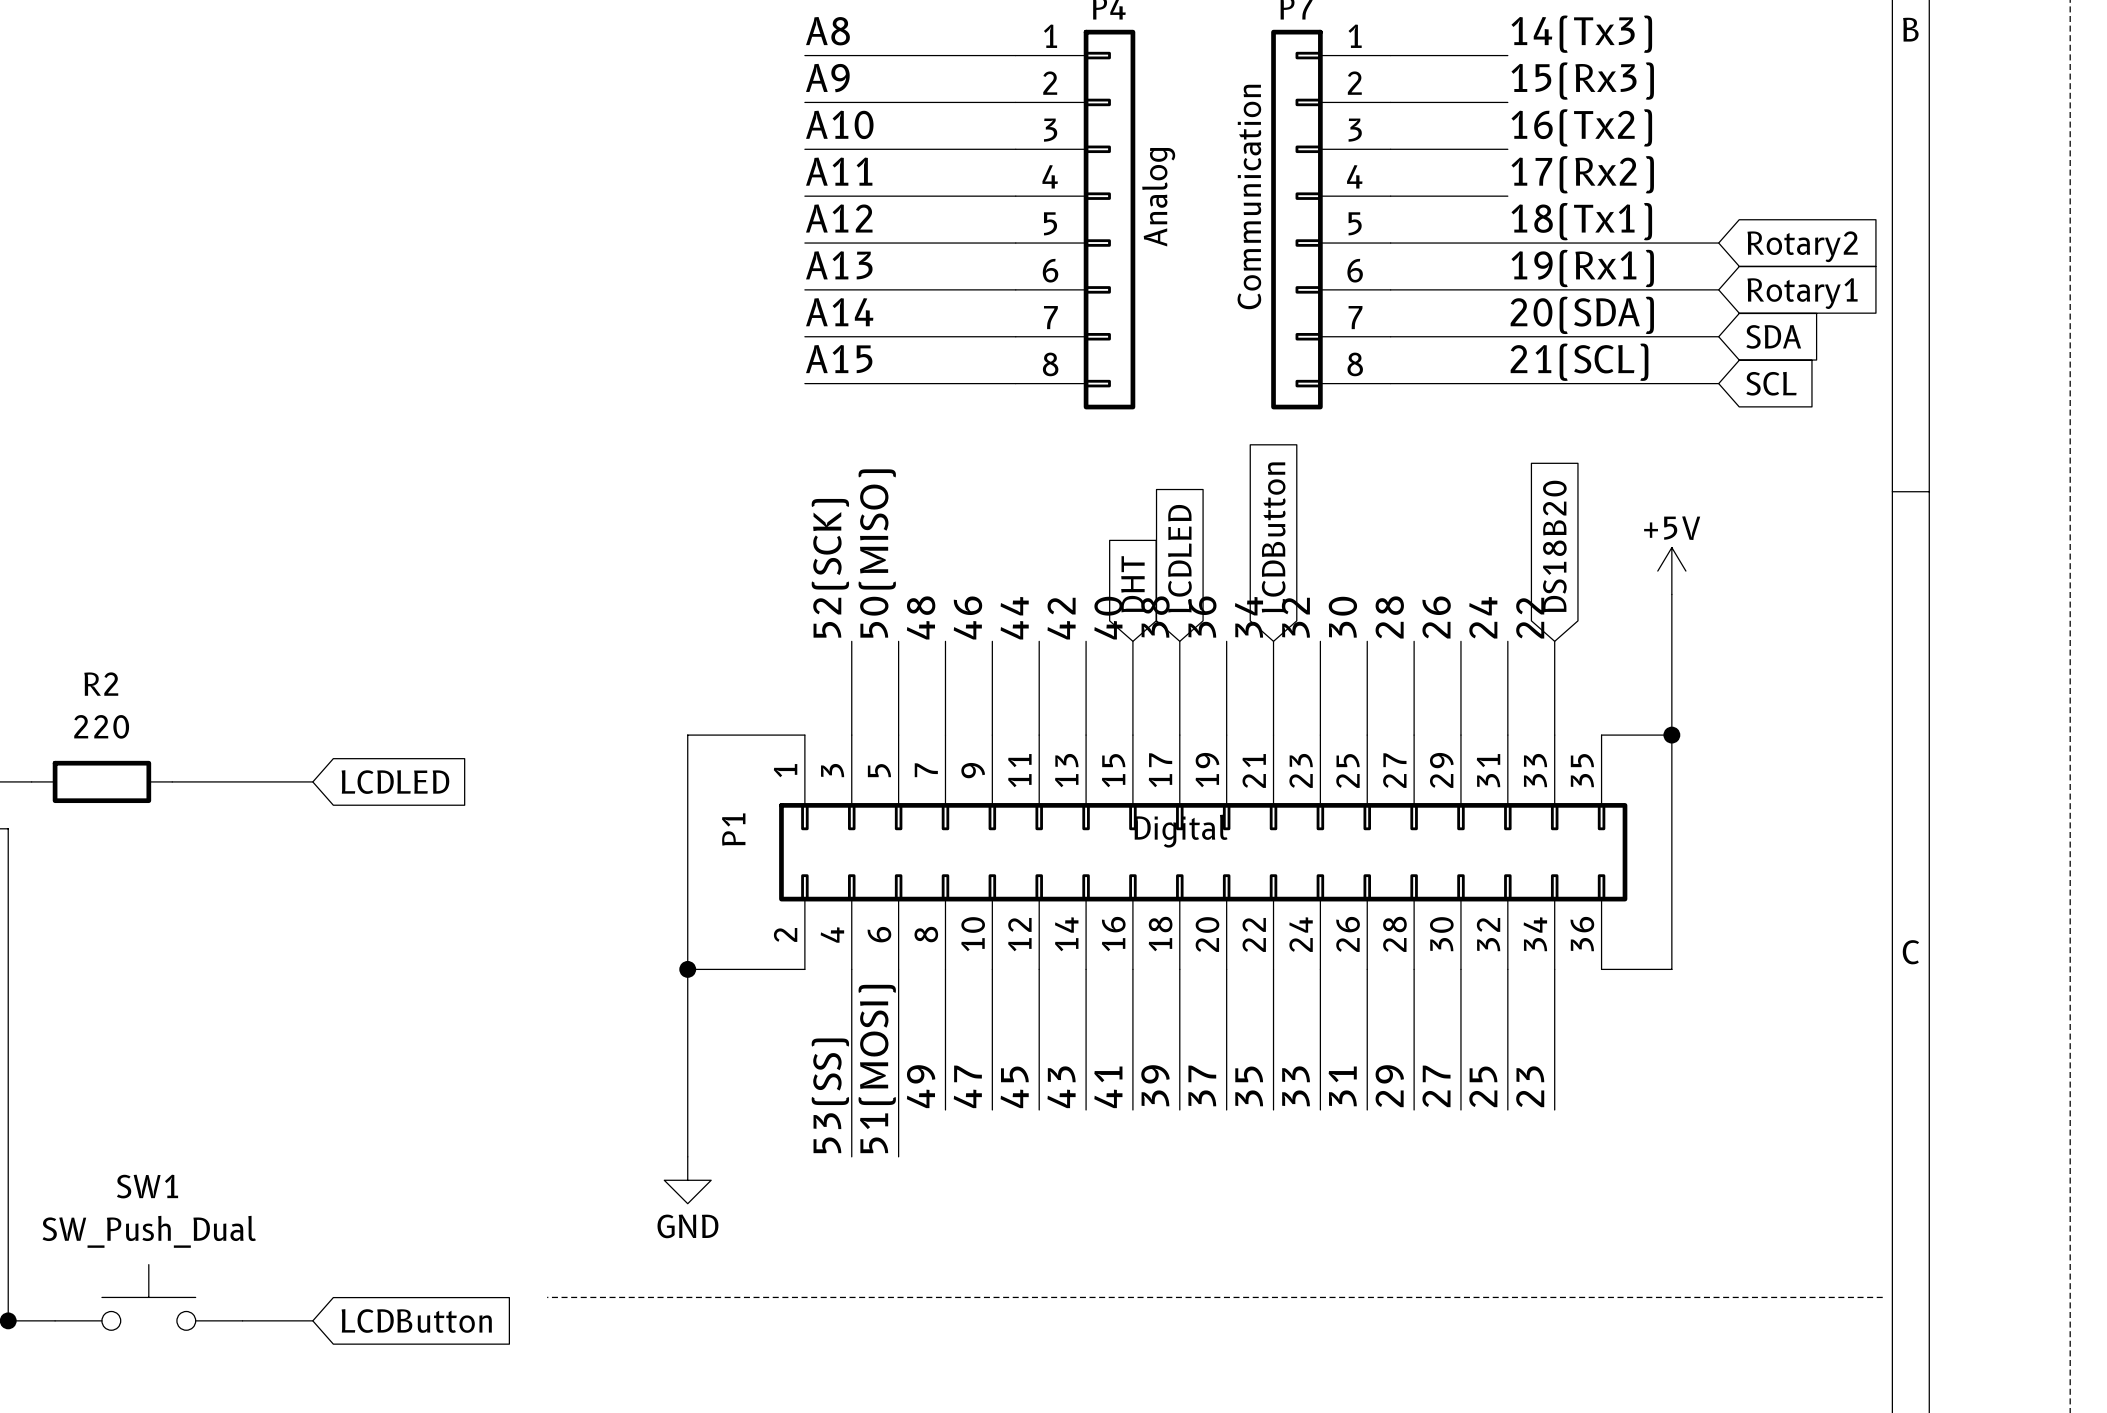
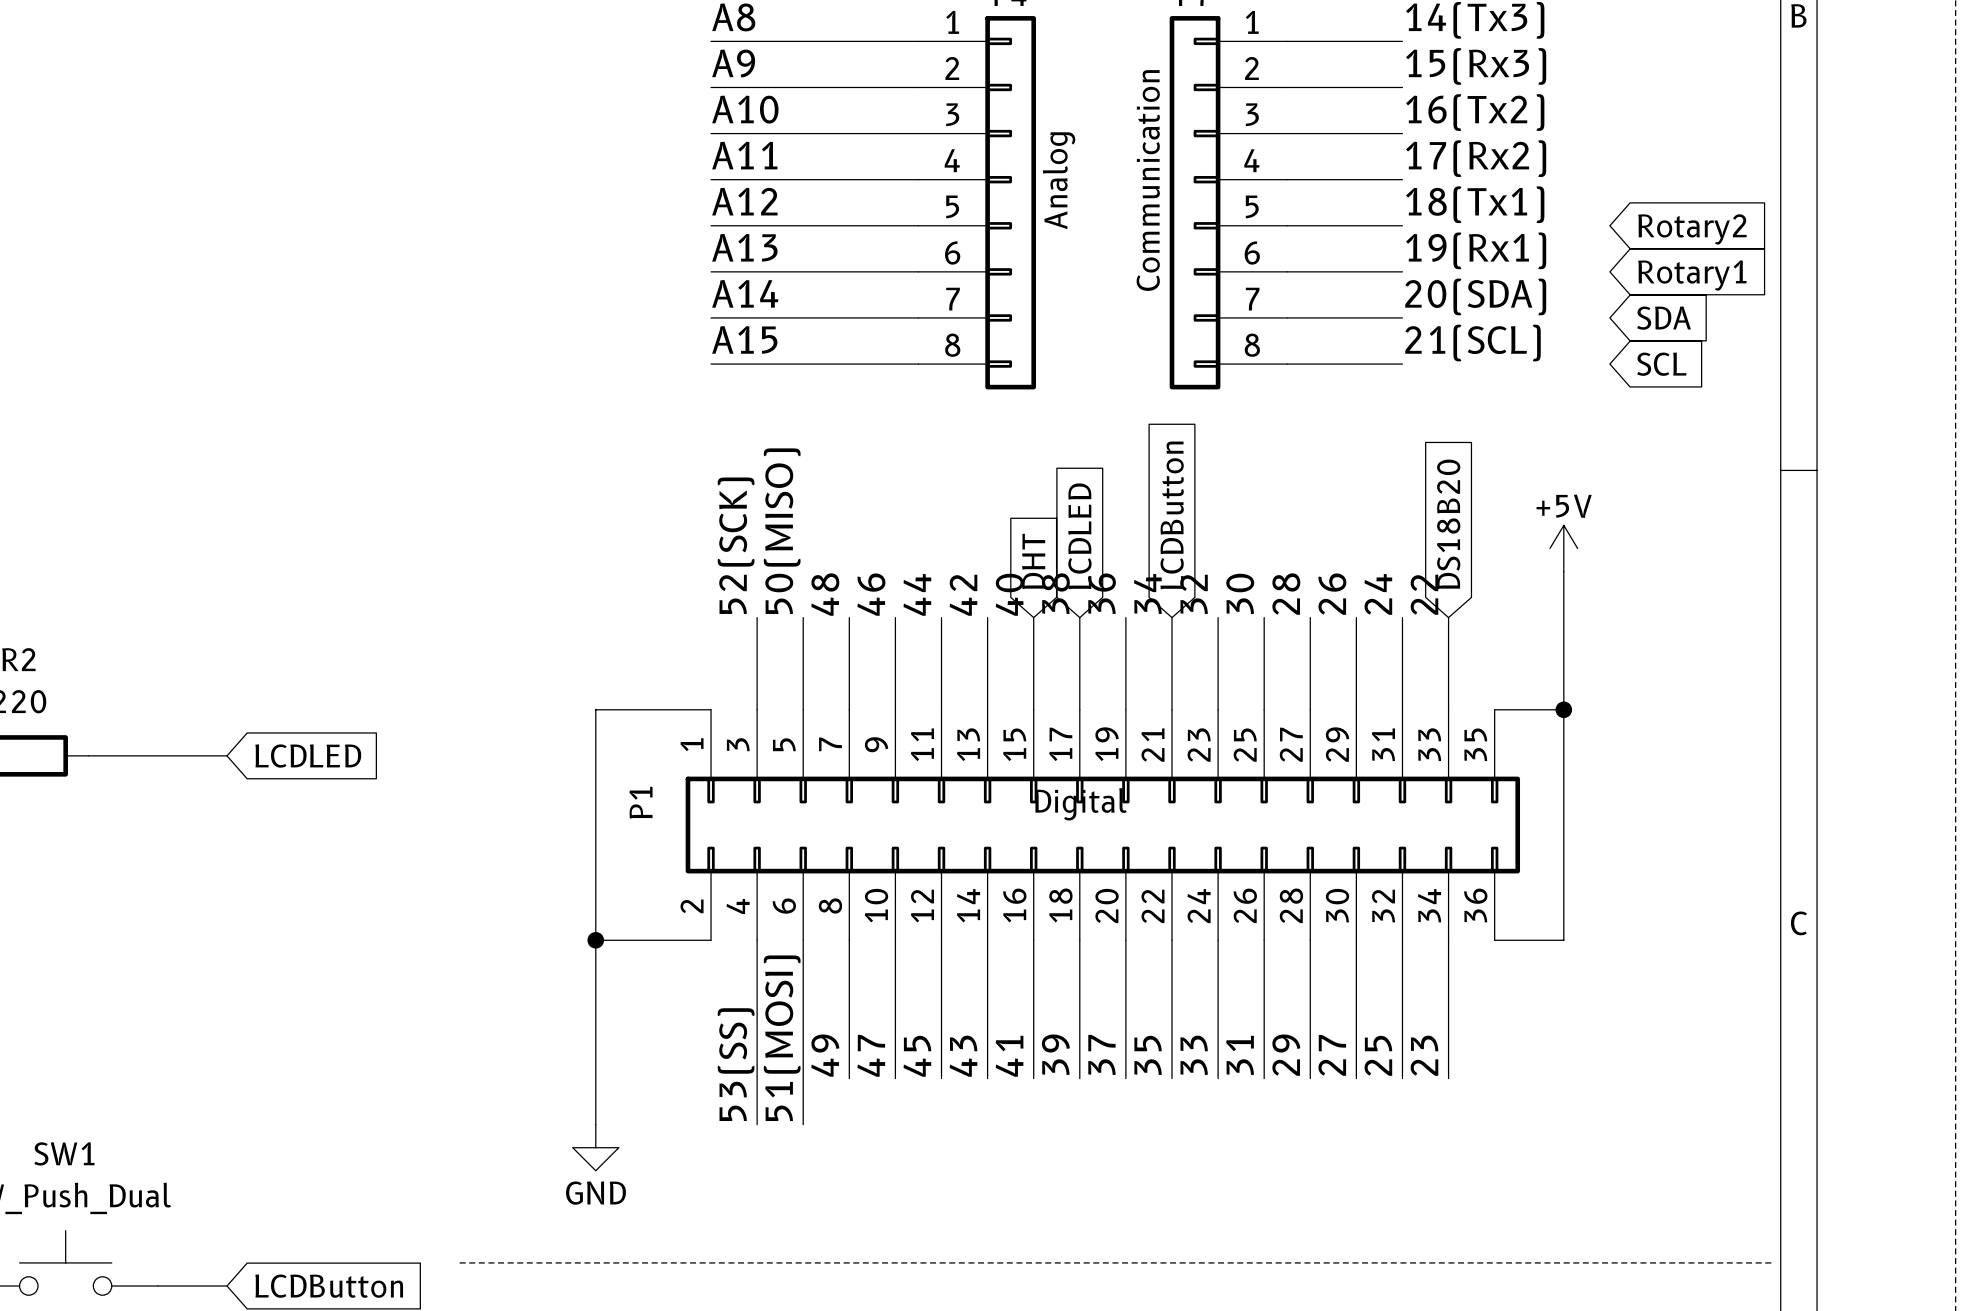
wire: (1507, 243) (1718, 243) -> none
wire: (1507, 289) (1718, 289) -> none
wire: (1507, 336) (1718, 336) -> none
wire: (1507, 383) (1718, 383) -> none

